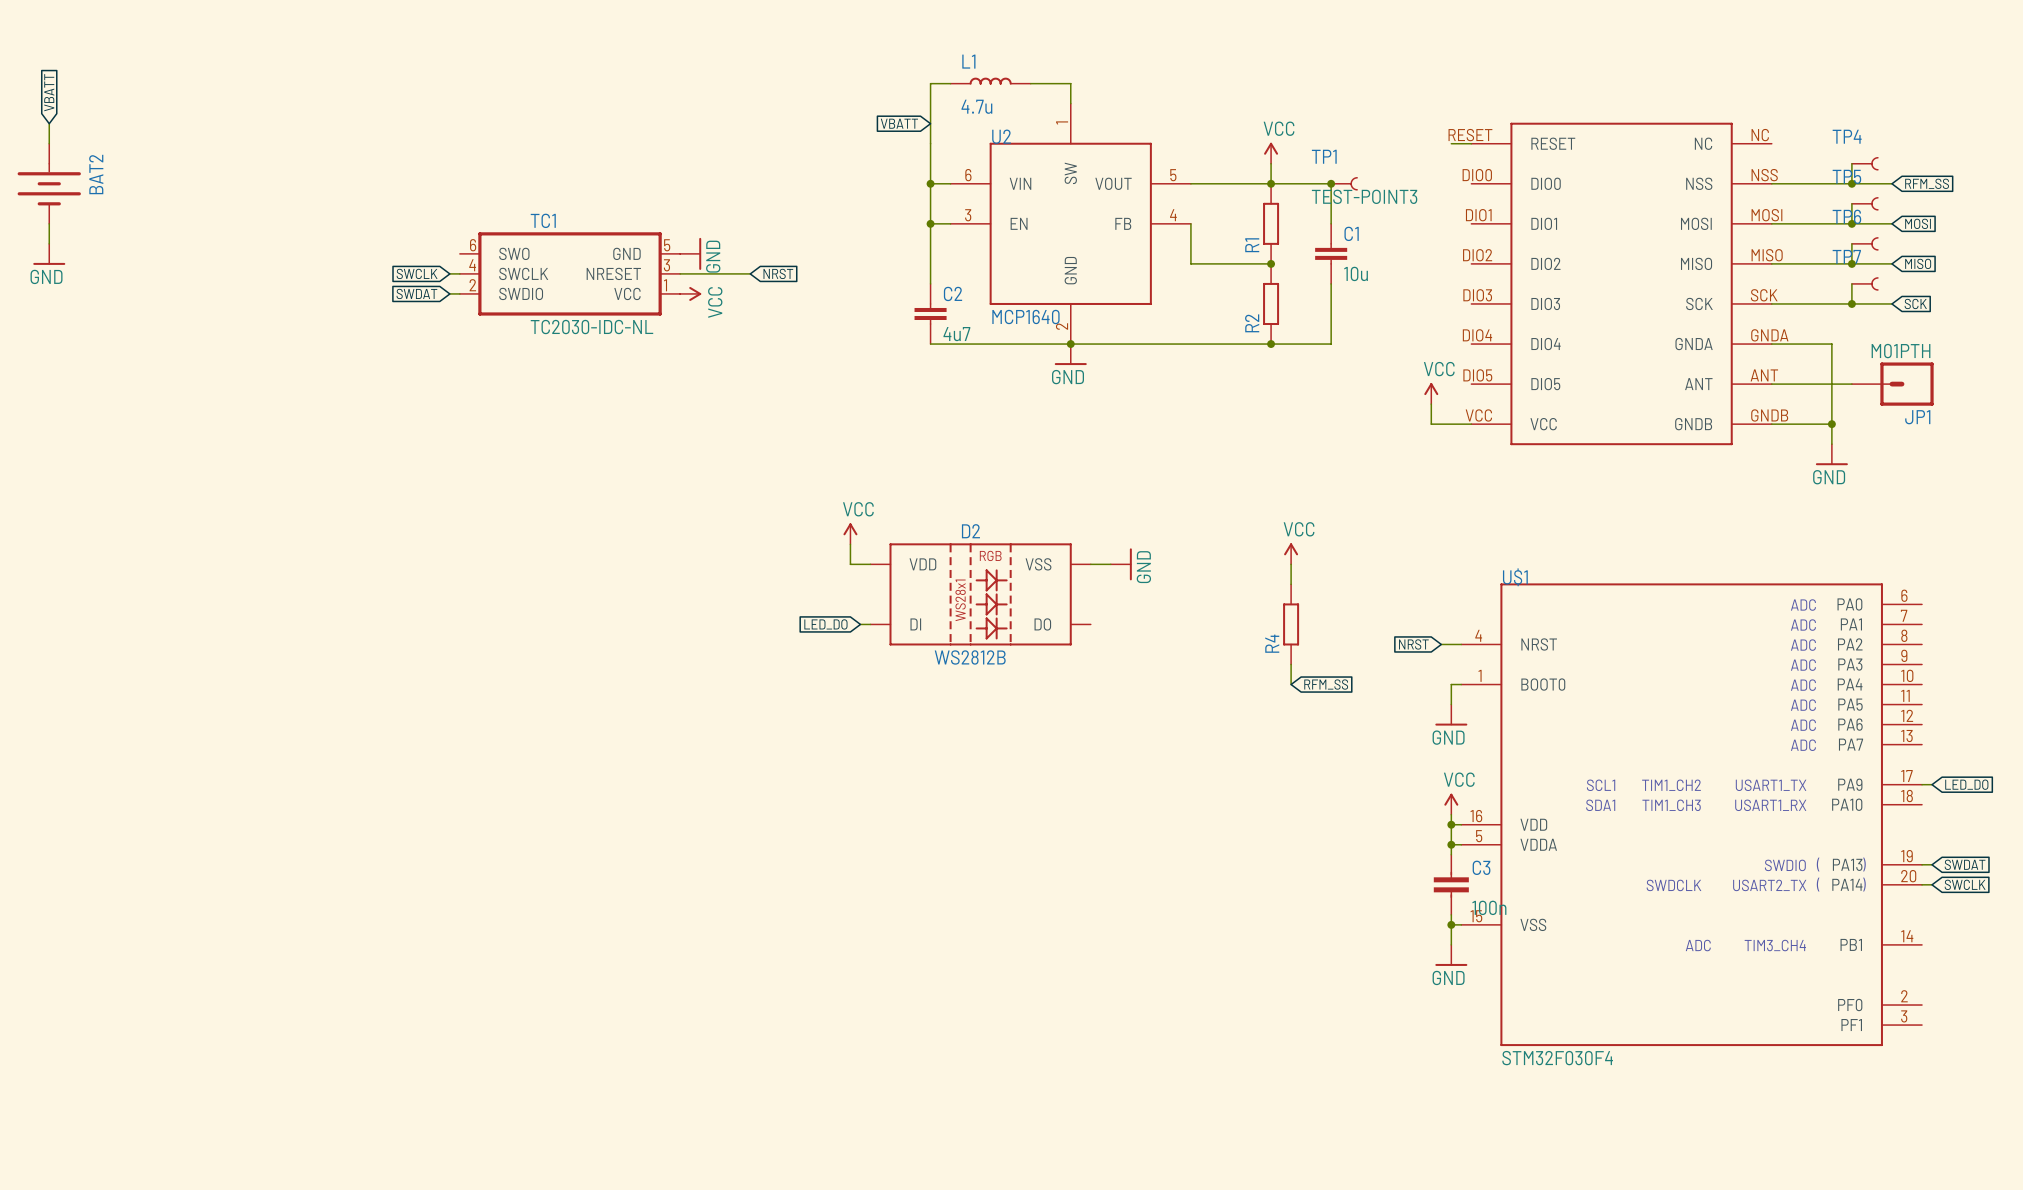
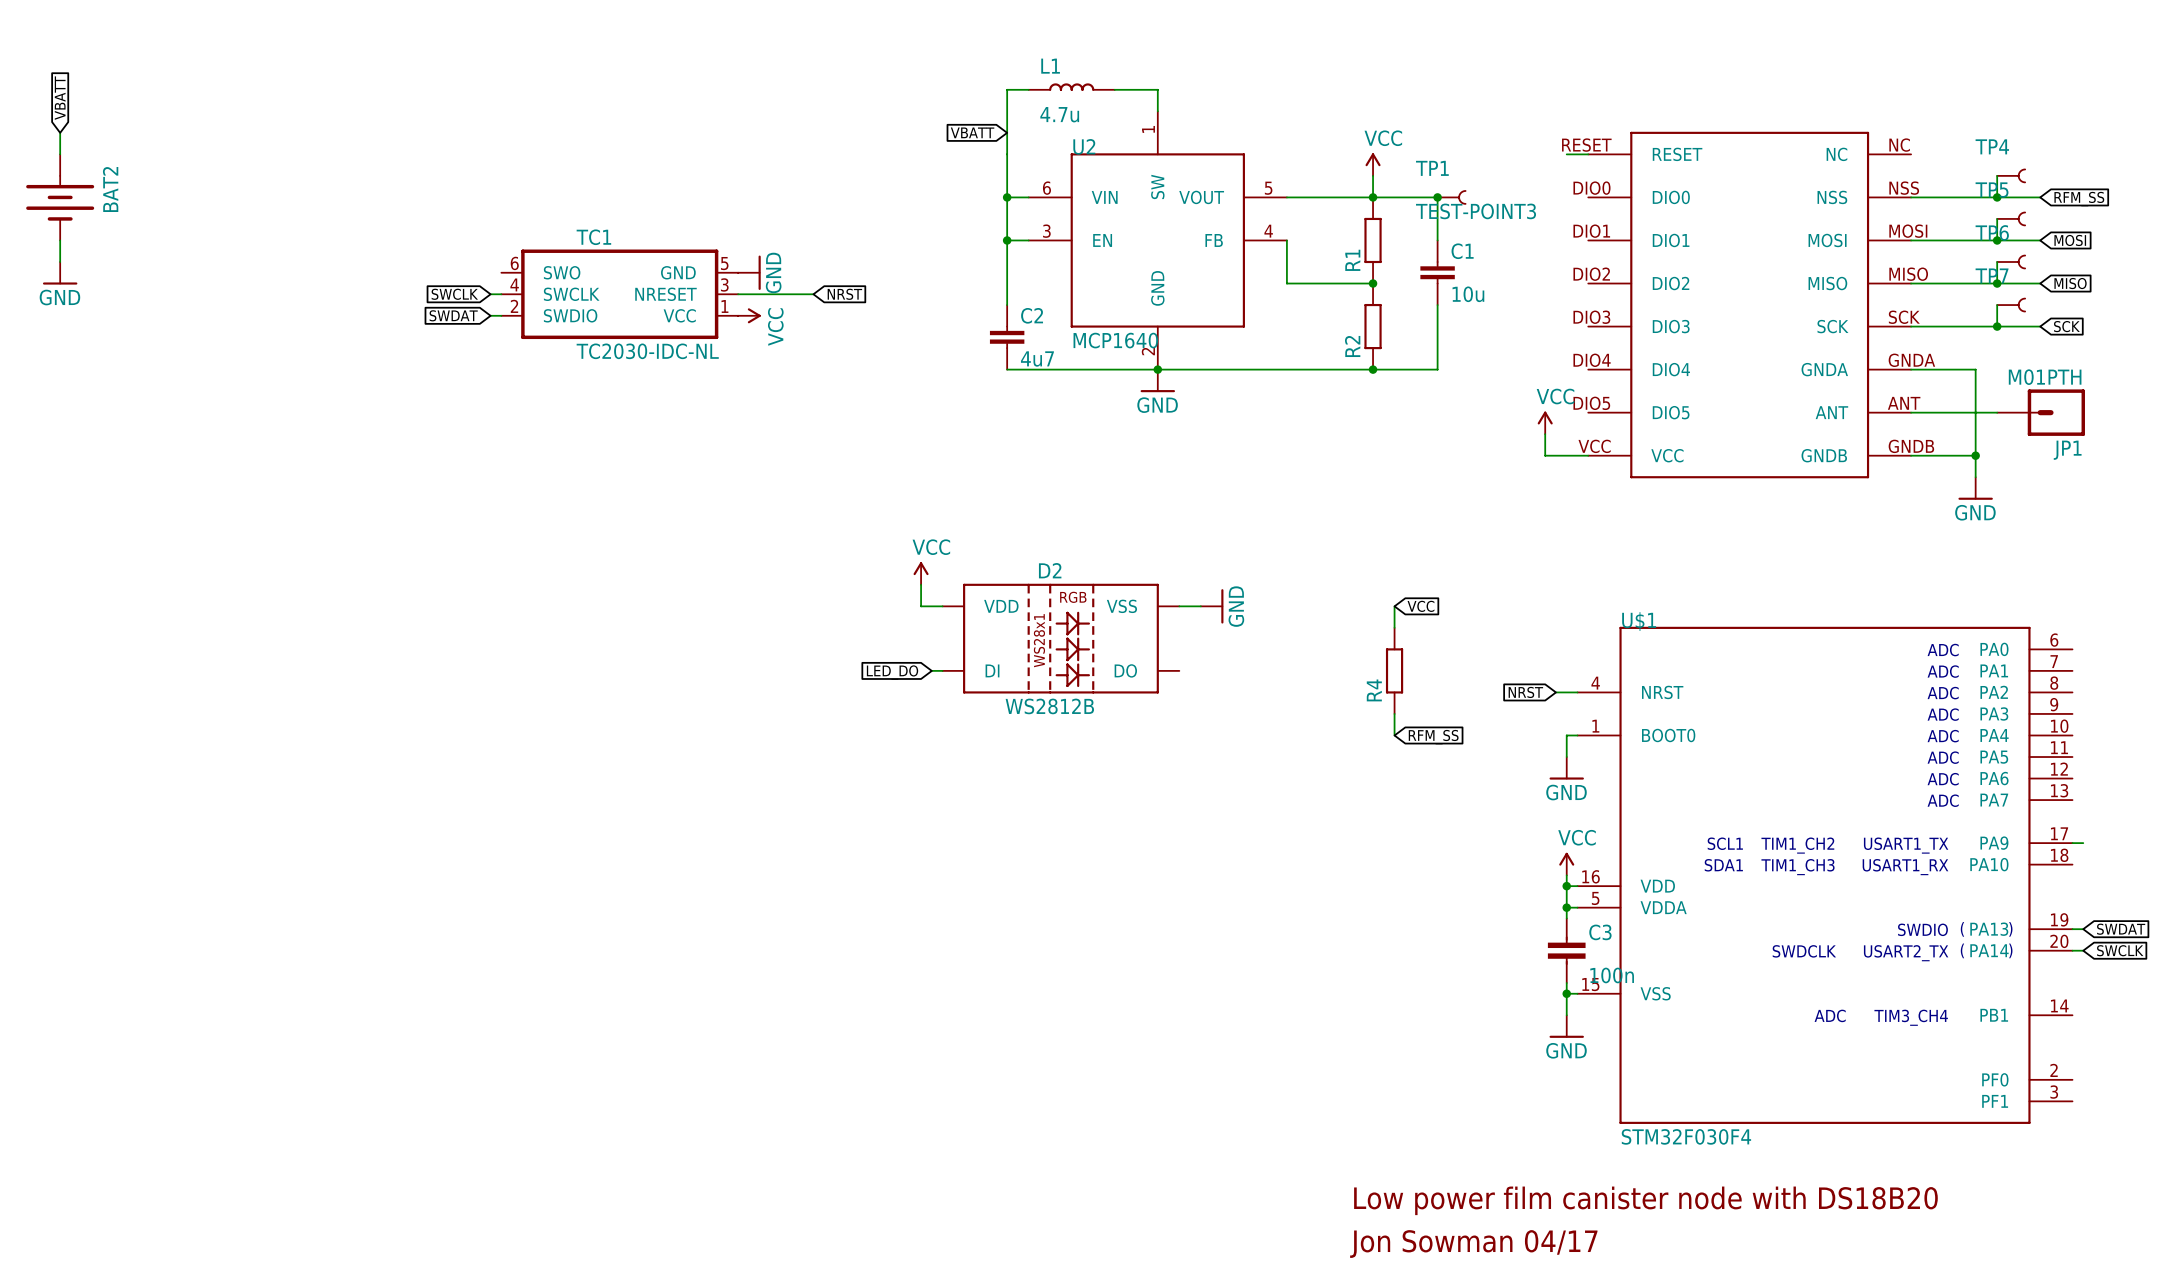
power symbol: VCC (1291, 553) -> none
global label: none -> VCC (1420, 606)
global label: LED_DO (1966, 784) -> none
text: none -> Low power film canister node with DS18B20 (1645, 1200)
text: none -> Jon Sowman 04/17 (1473, 1244)

